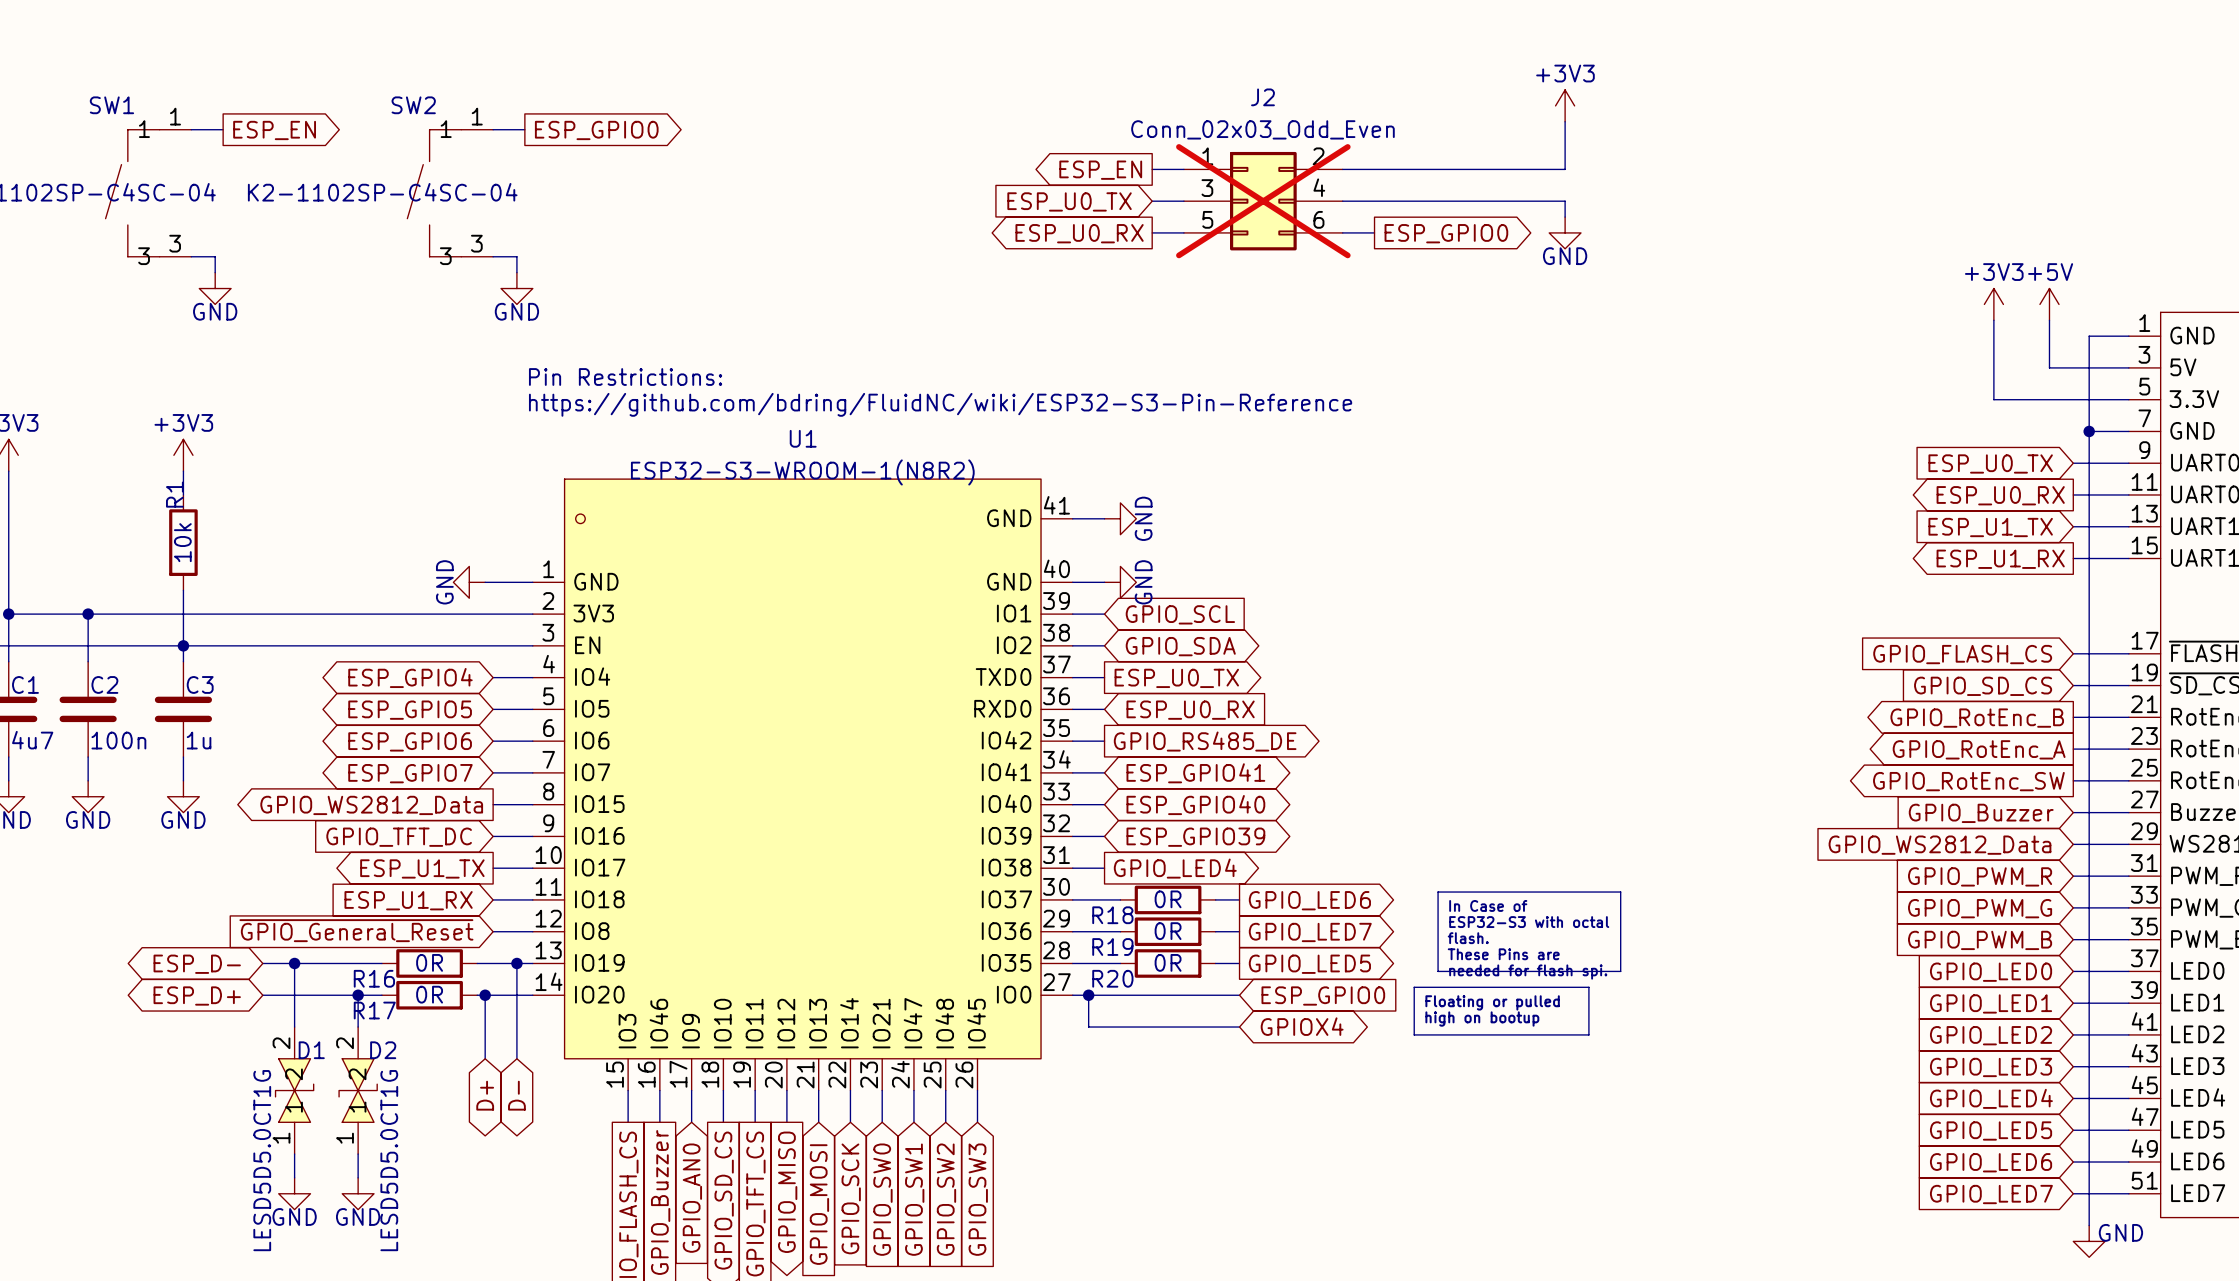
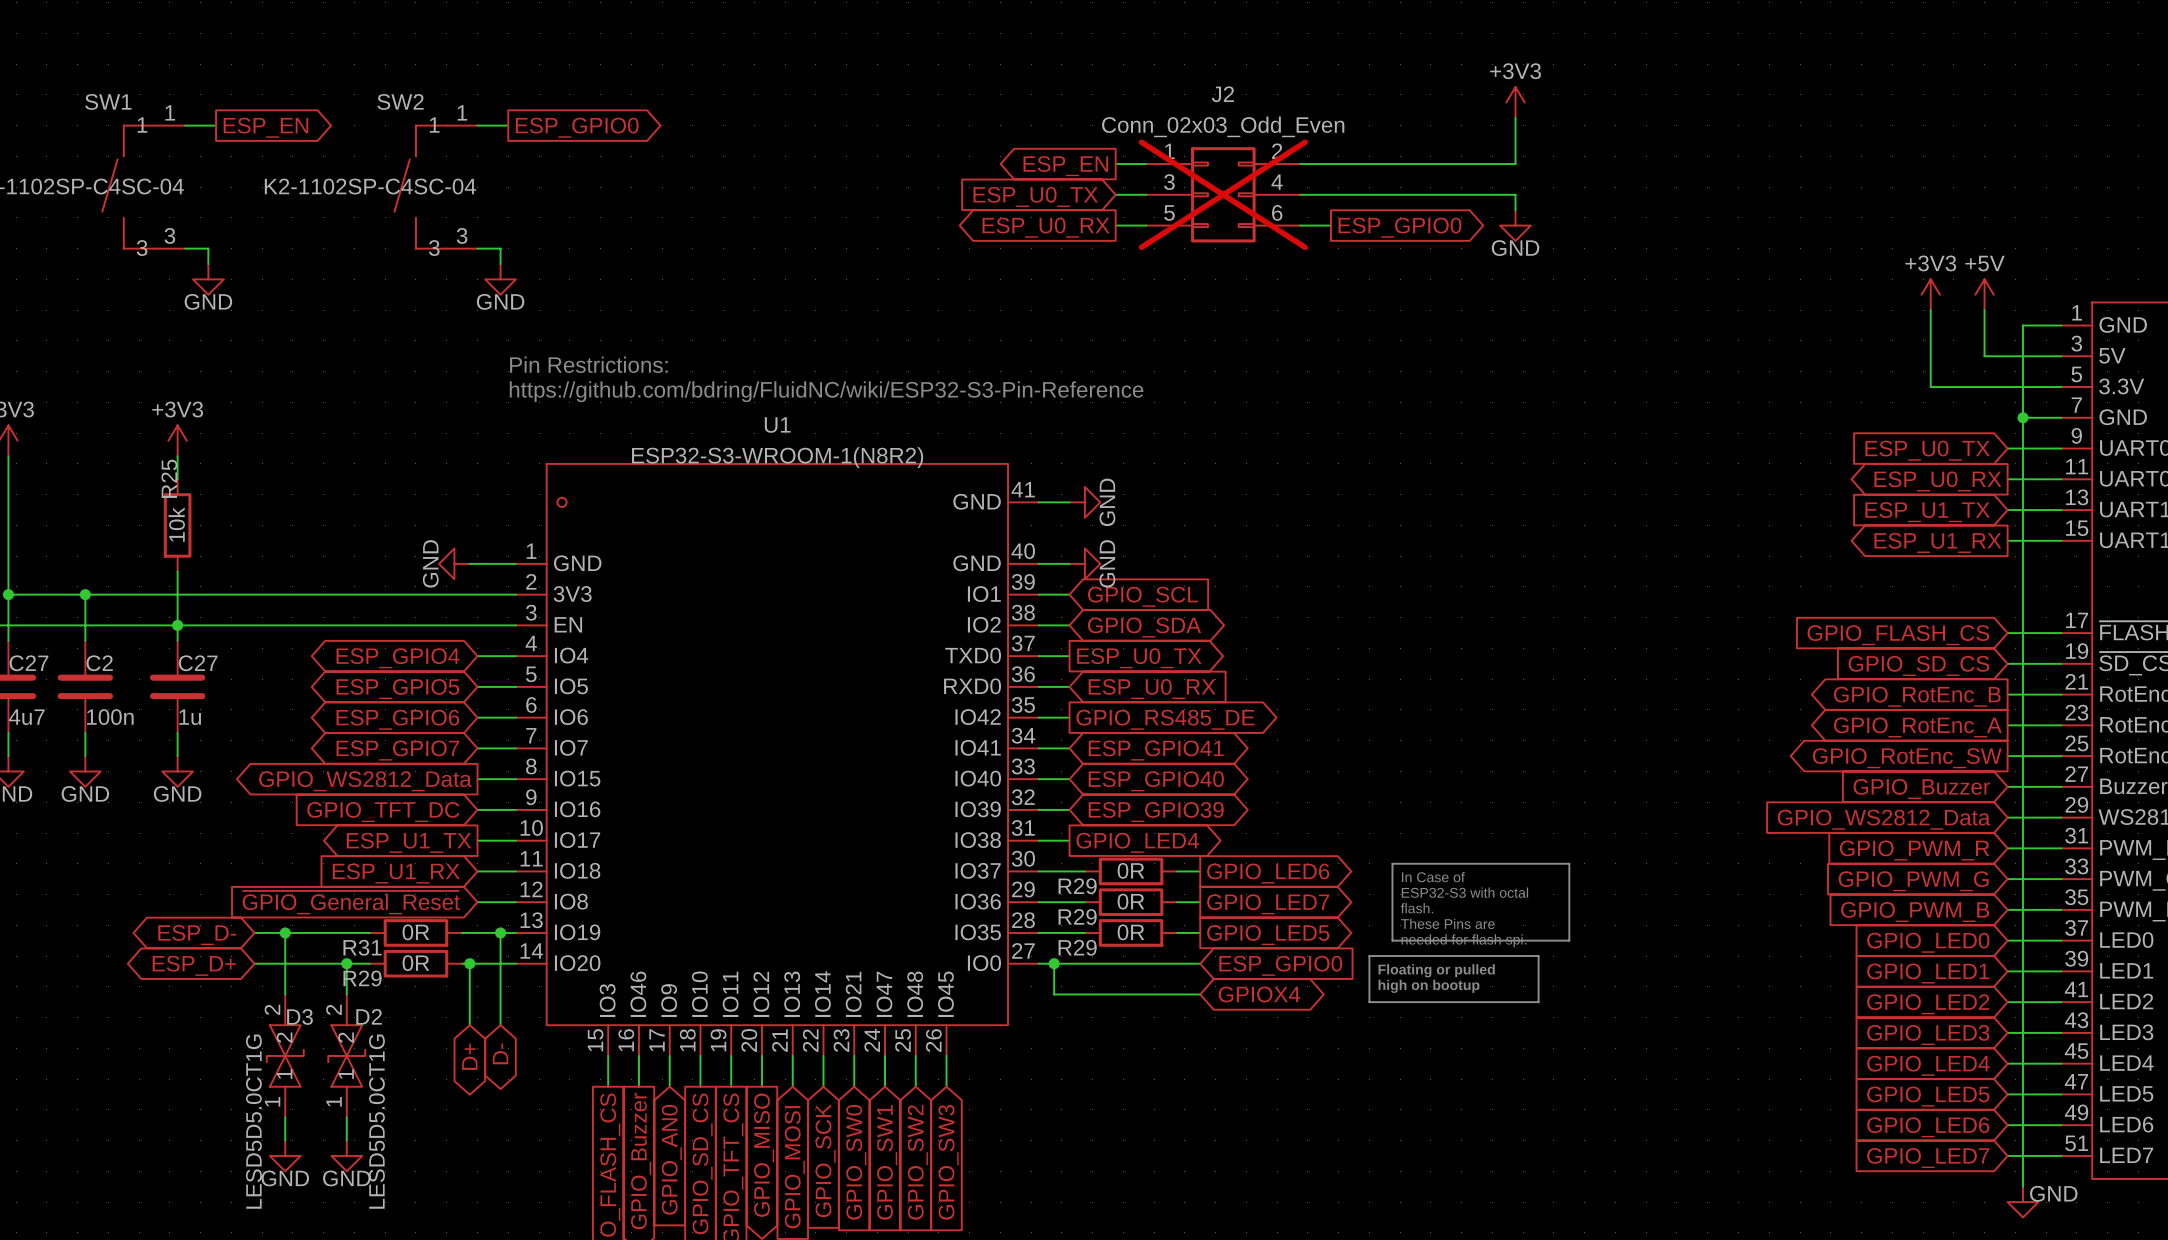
R1 name: R1 (174, 494) -> R25 (169, 478)
C1 name: C1 (25, 684) -> C27 (28, 663)
C3 name: C3 (200, 684) -> C27 (198, 663)
R18 name: R18 (1112, 915) -> R29 (1077, 886)
R19 name: R19 (1112, 947) -> R29 (1077, 917)
R16 name: R16 (374, 978) -> R31 (362, 947)
R20 name: R20 (1112, 978) -> R29 (1077, 947)
R17 name: R17 (374, 1010) -> R29 (362, 978)
D1 name: D1 (311, 1050) -> D3 (299, 1016)

